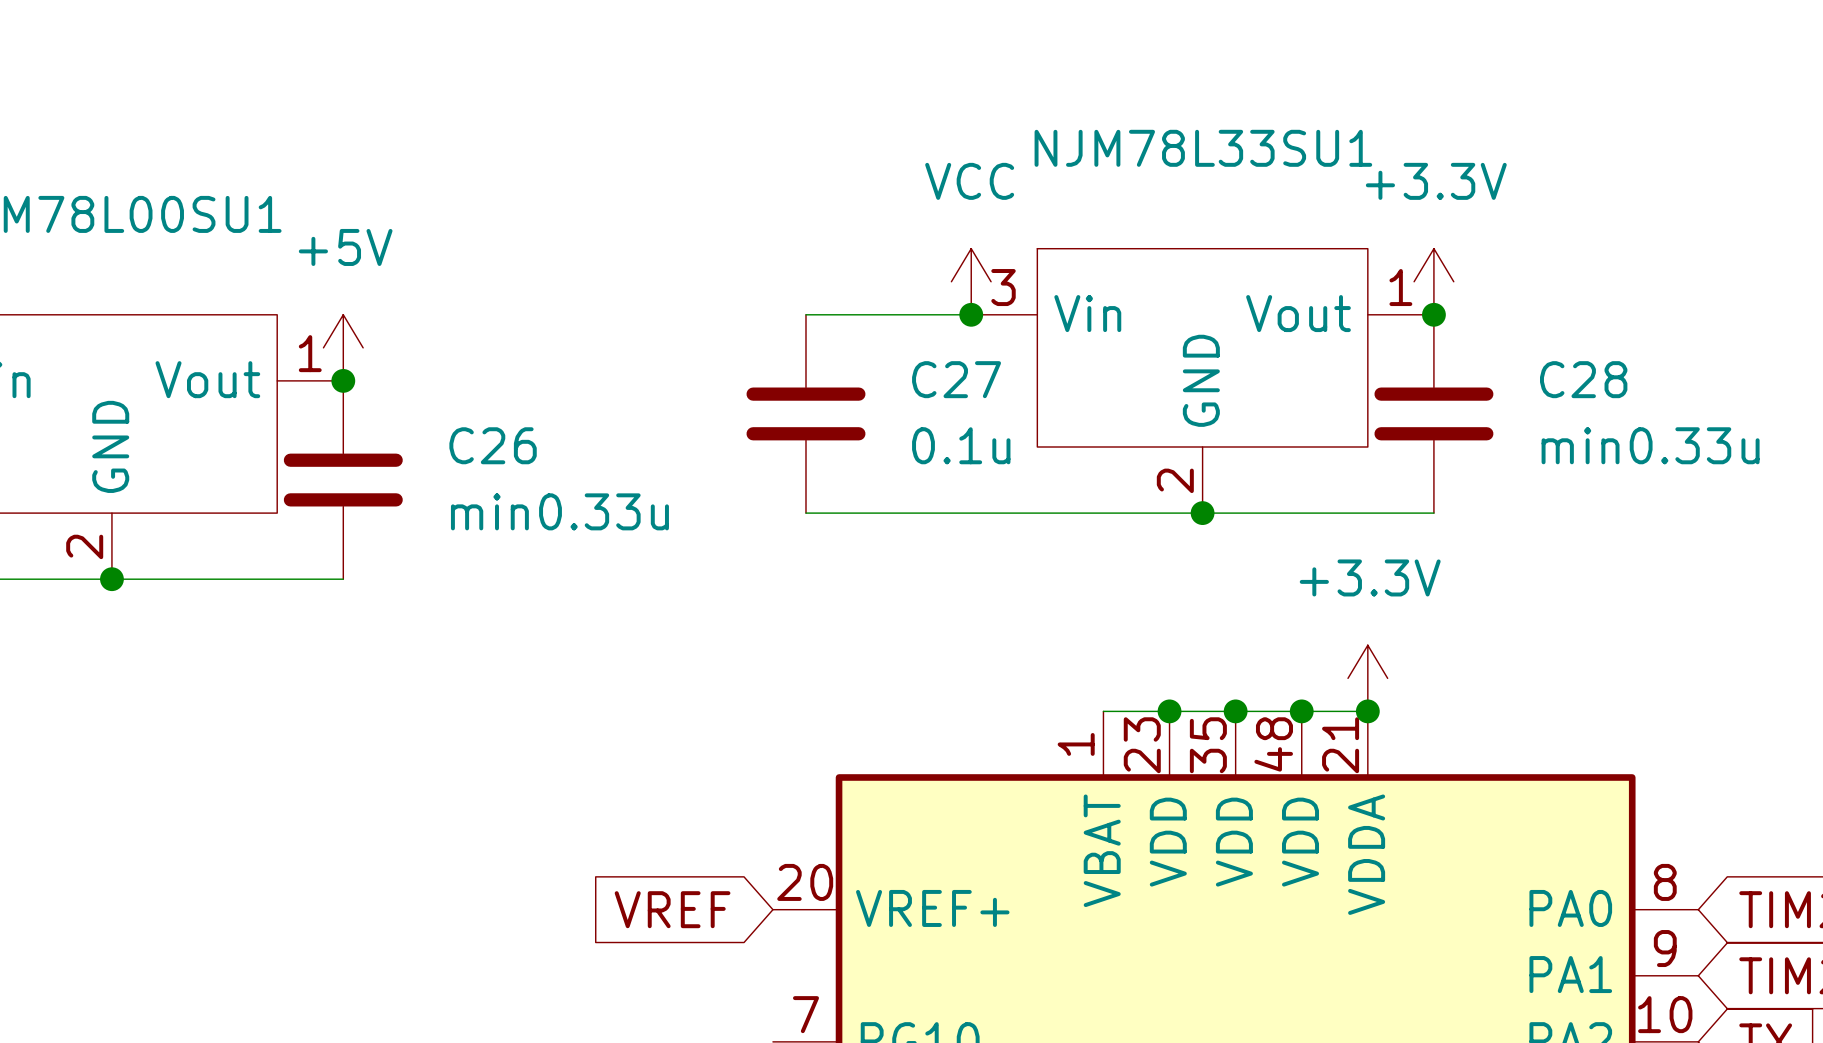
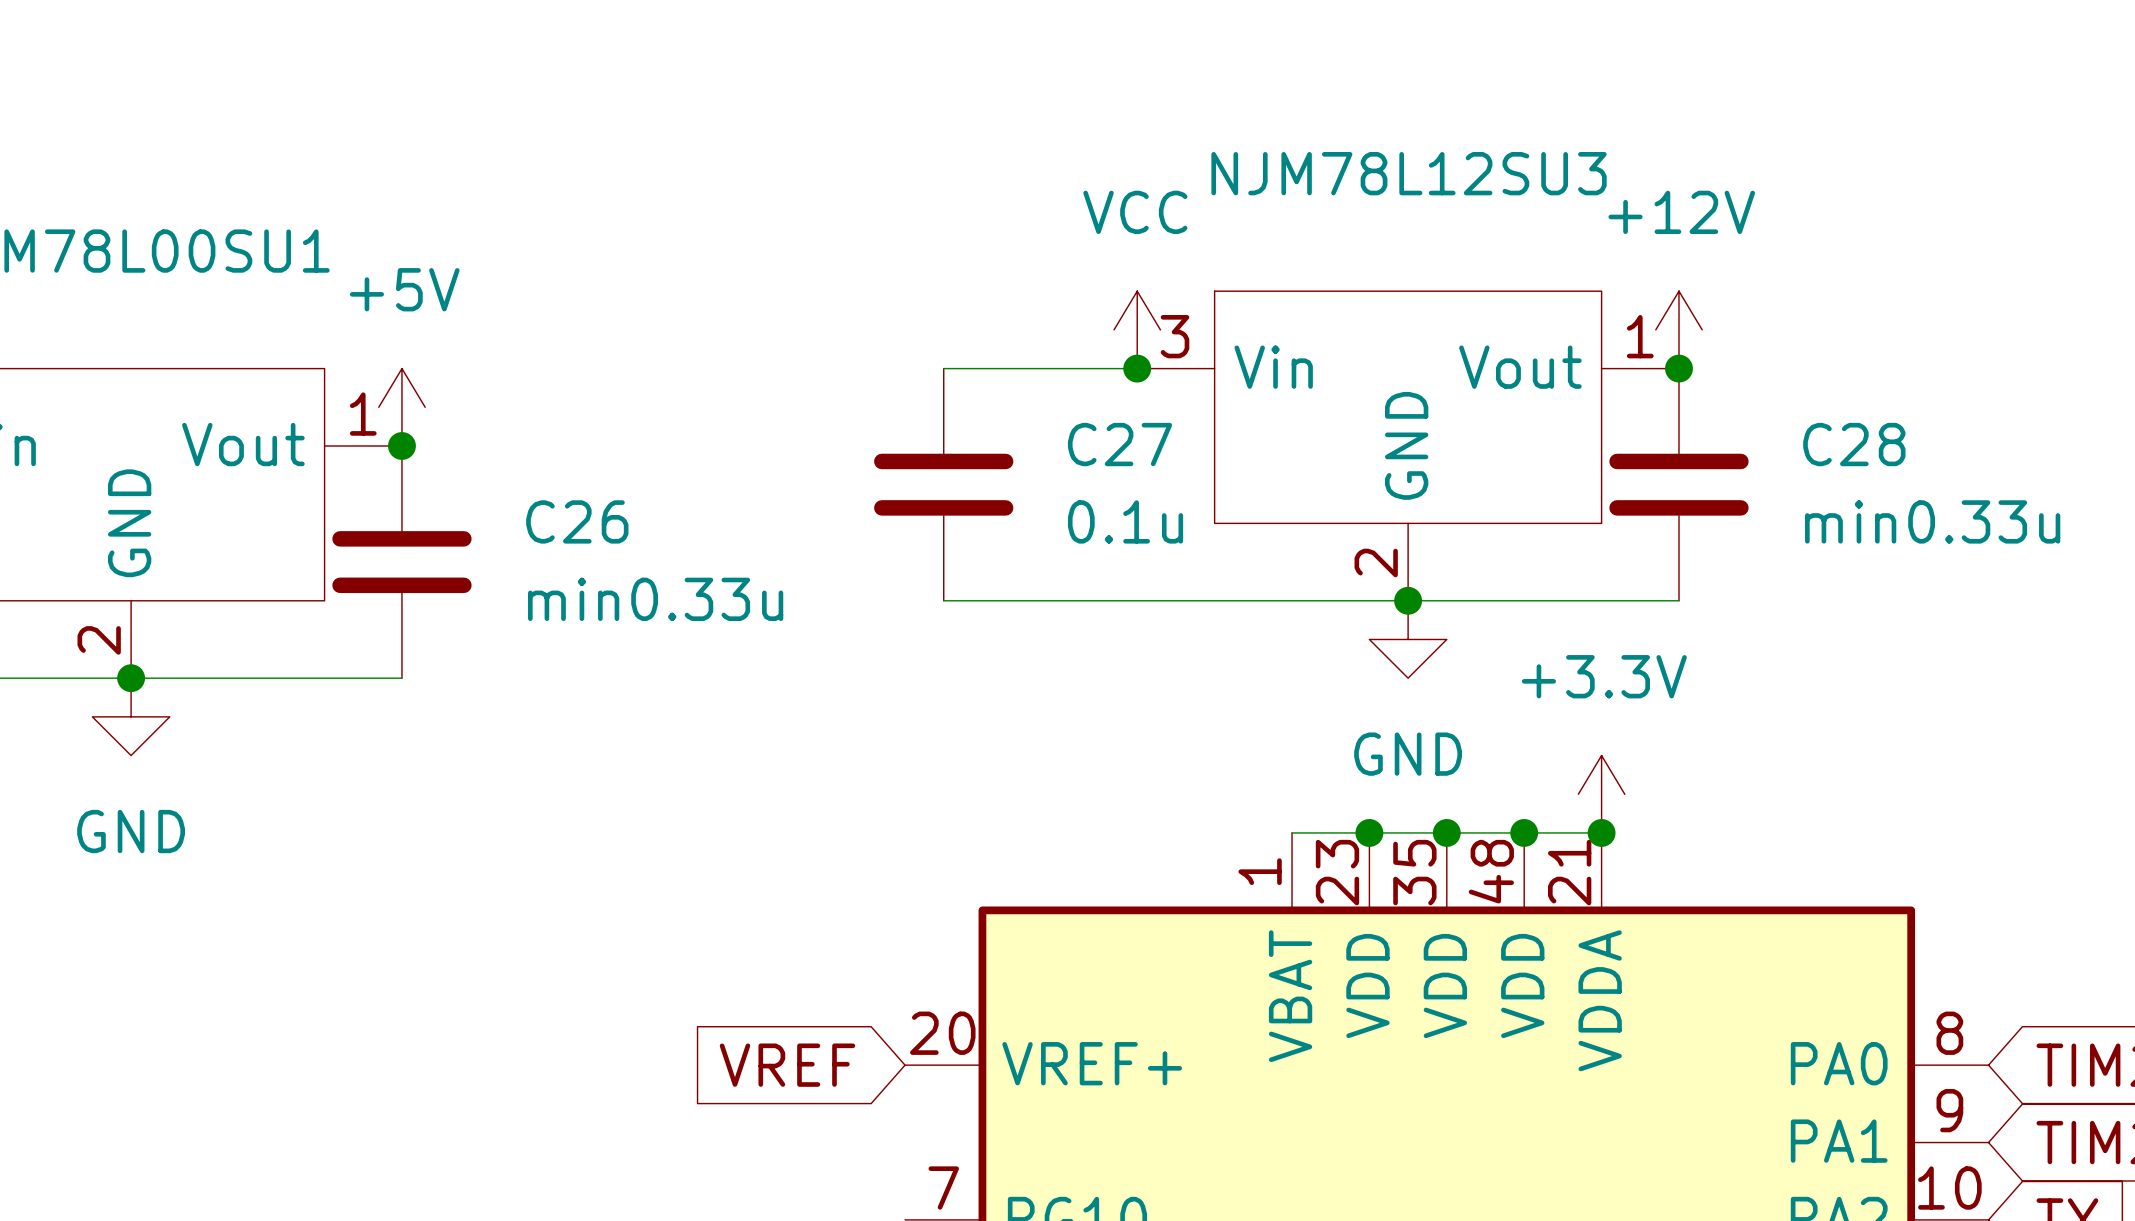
NJM78L33SU1 name: NJM78L33SU1 (1203, 148) -> NJM78L12SU3 (1409, 173)
power symbol: +3.3V (1433, 281) -> +12V (1678, 329)
power symbol: none -> GND (1408, 639)
power symbol: none -> GND (131, 716)

